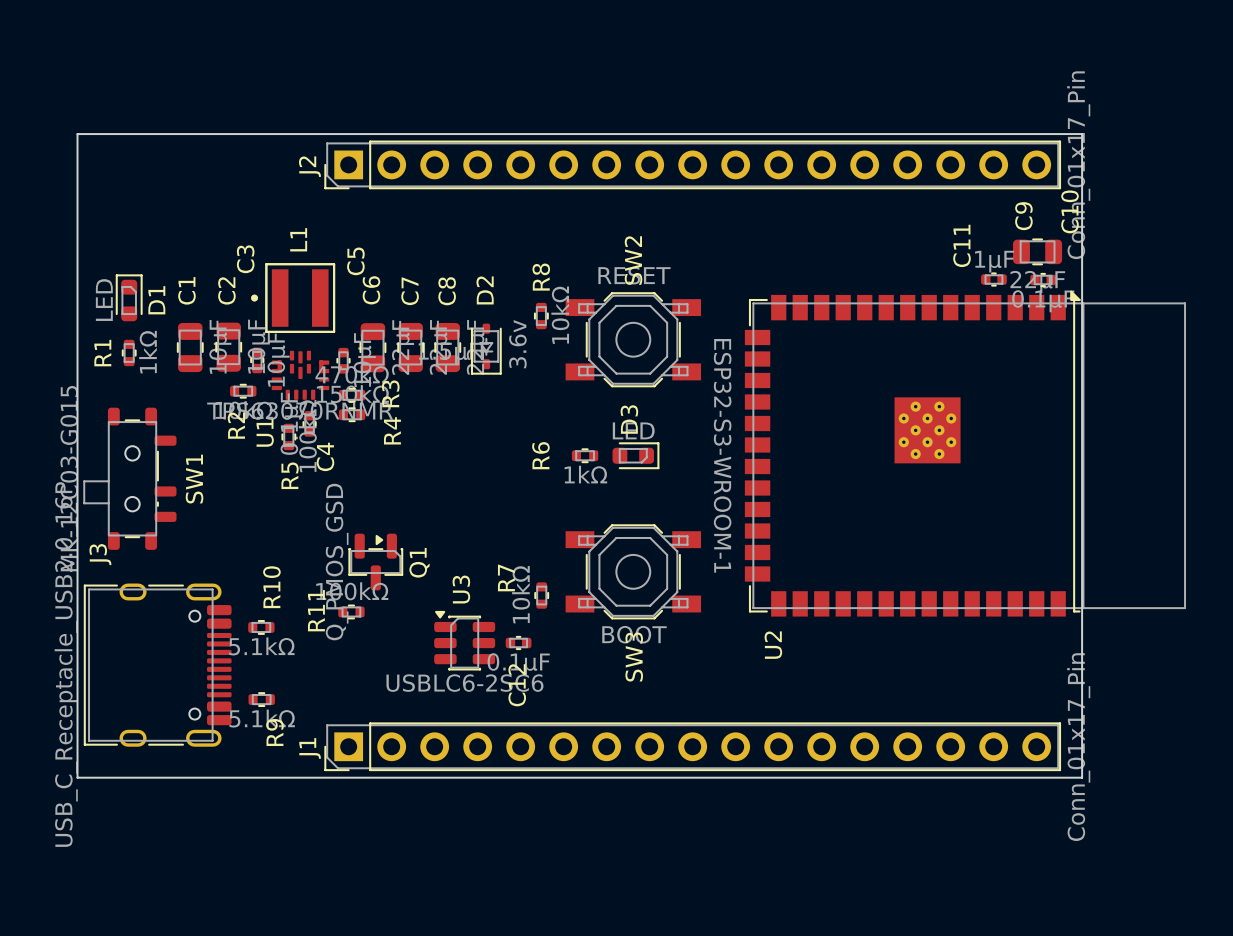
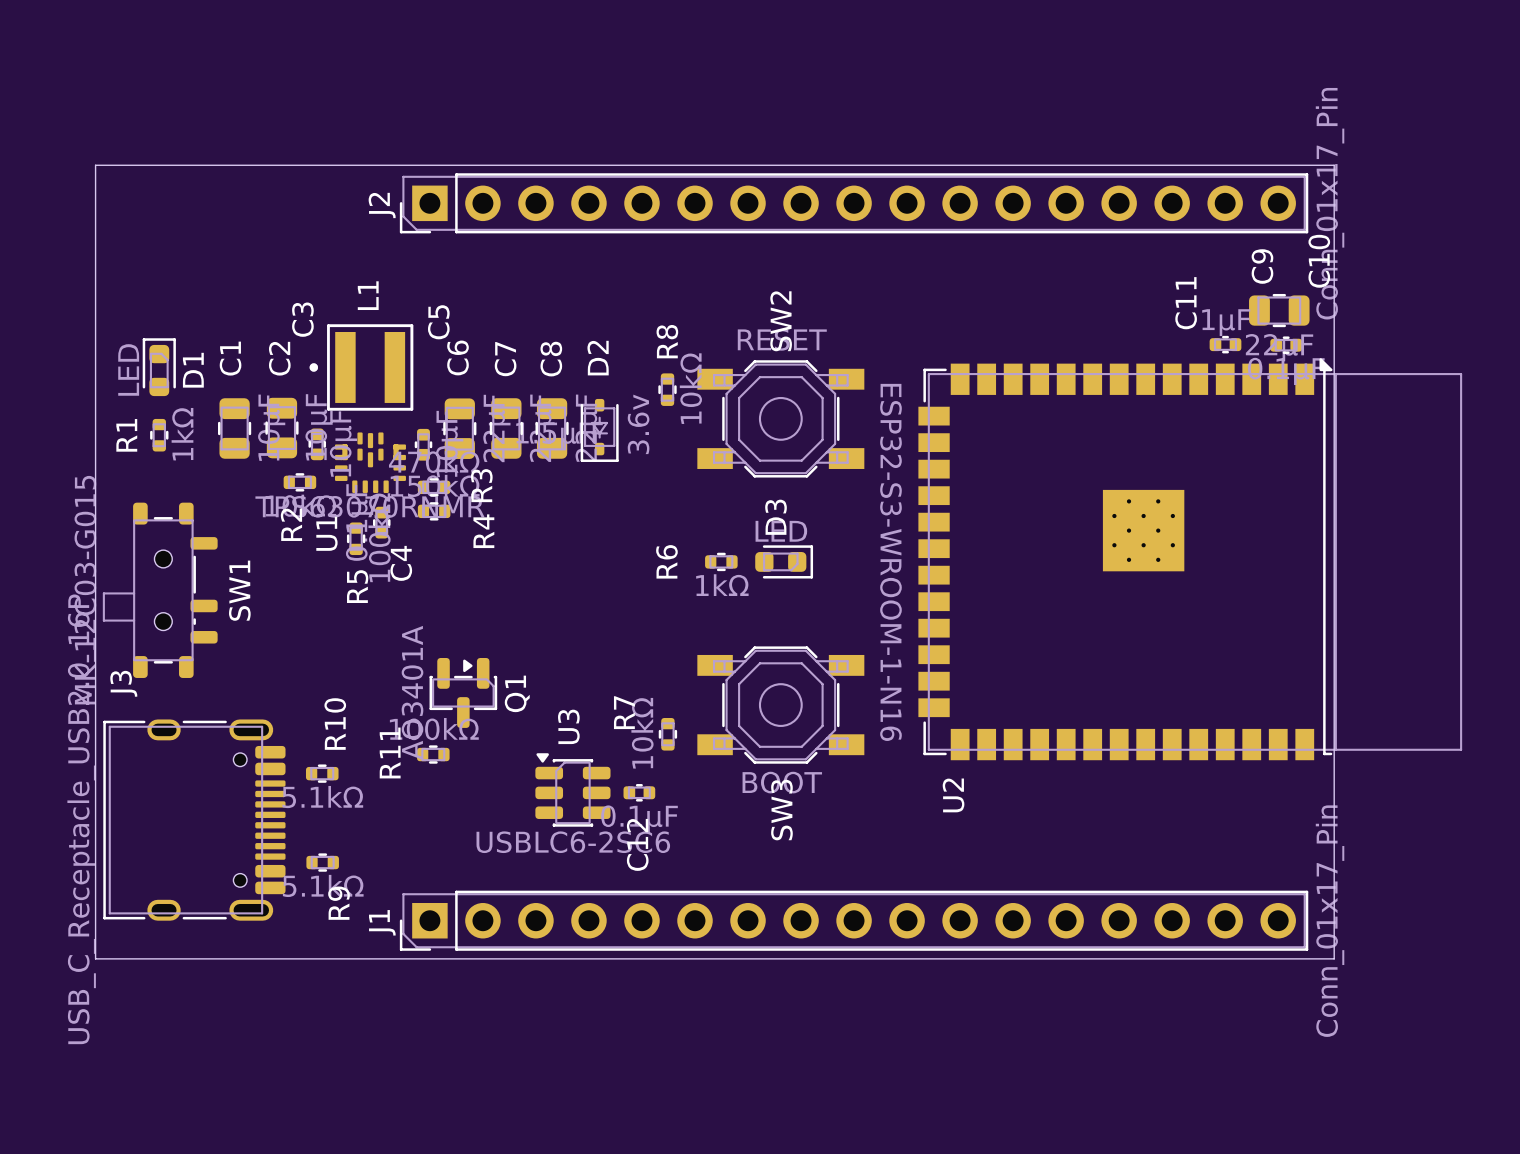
U2 value: ESP32-S3-WROOM-1 (722, 455) -> ESP32-S3-WROOM-1-N16 (890, 562)
Q1 value: Q_PMOS_GSD (337, 562) -> AO3401A (412, 692)

